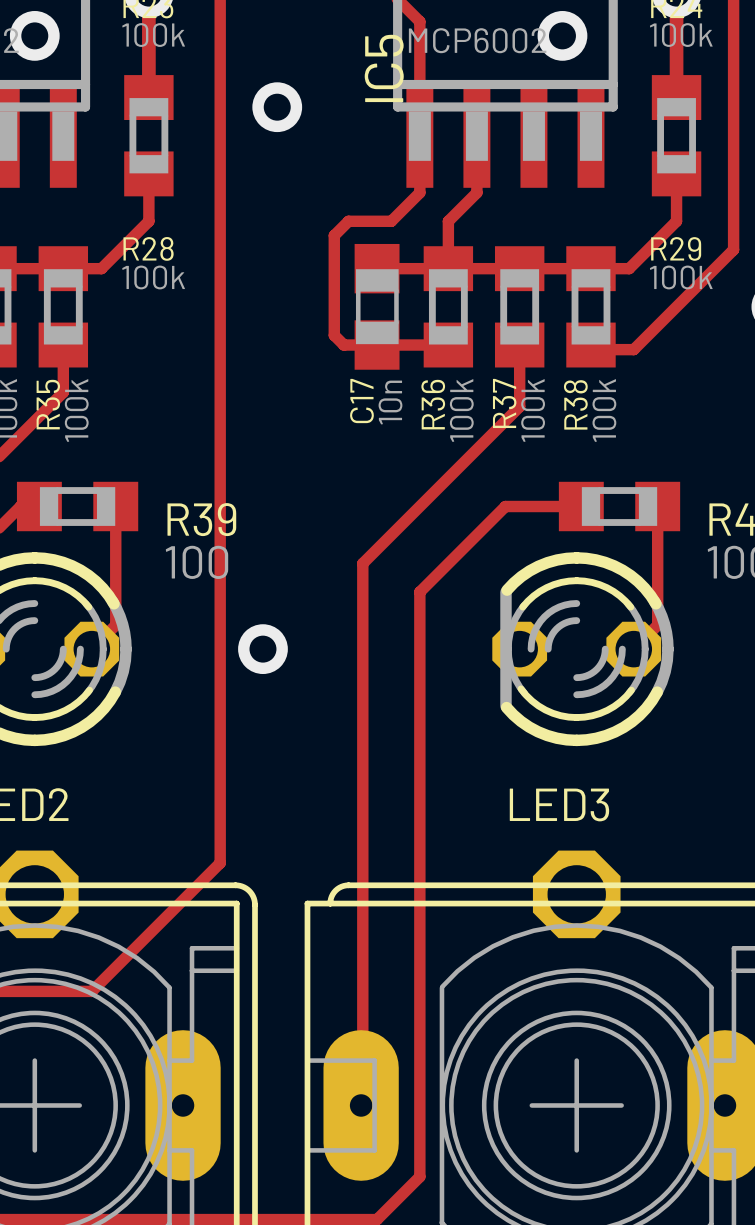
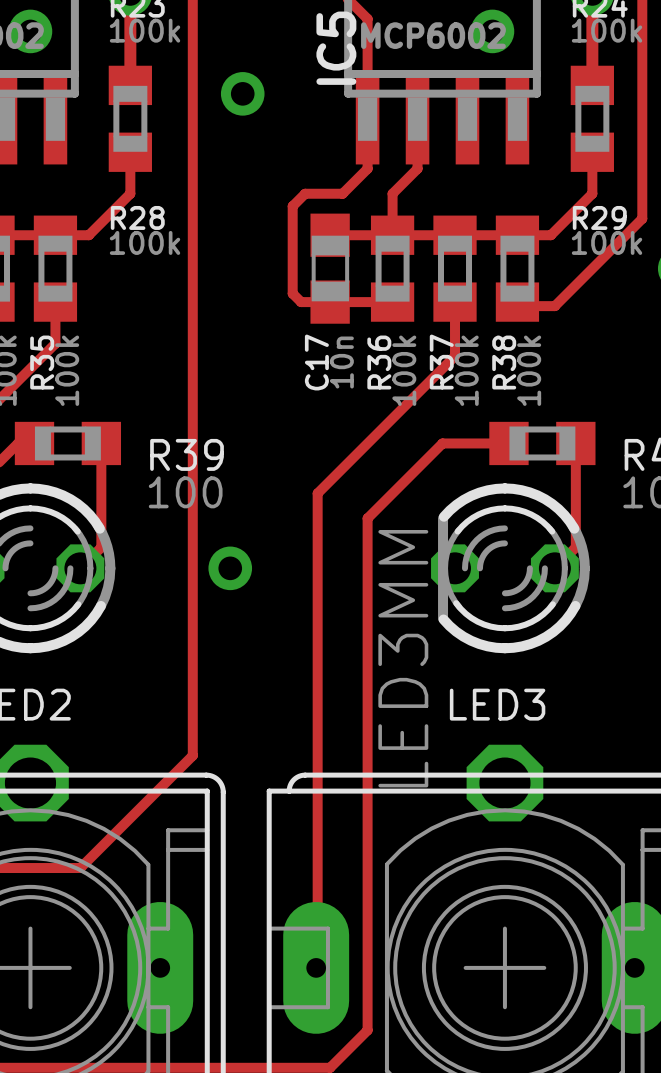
LED3 value: none -> LED3MM (403, 658)

